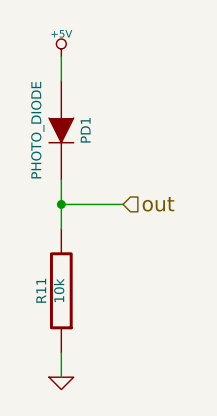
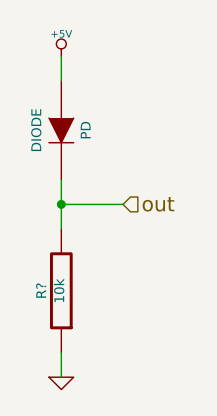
PD1 value: PHOTO_DIODE (37, 130) -> DIODE (36, 130)
PD1 name: PD1 (85, 130) -> PD (85, 130)
R11 name: R11 (41, 290) -> R? (41, 290)

